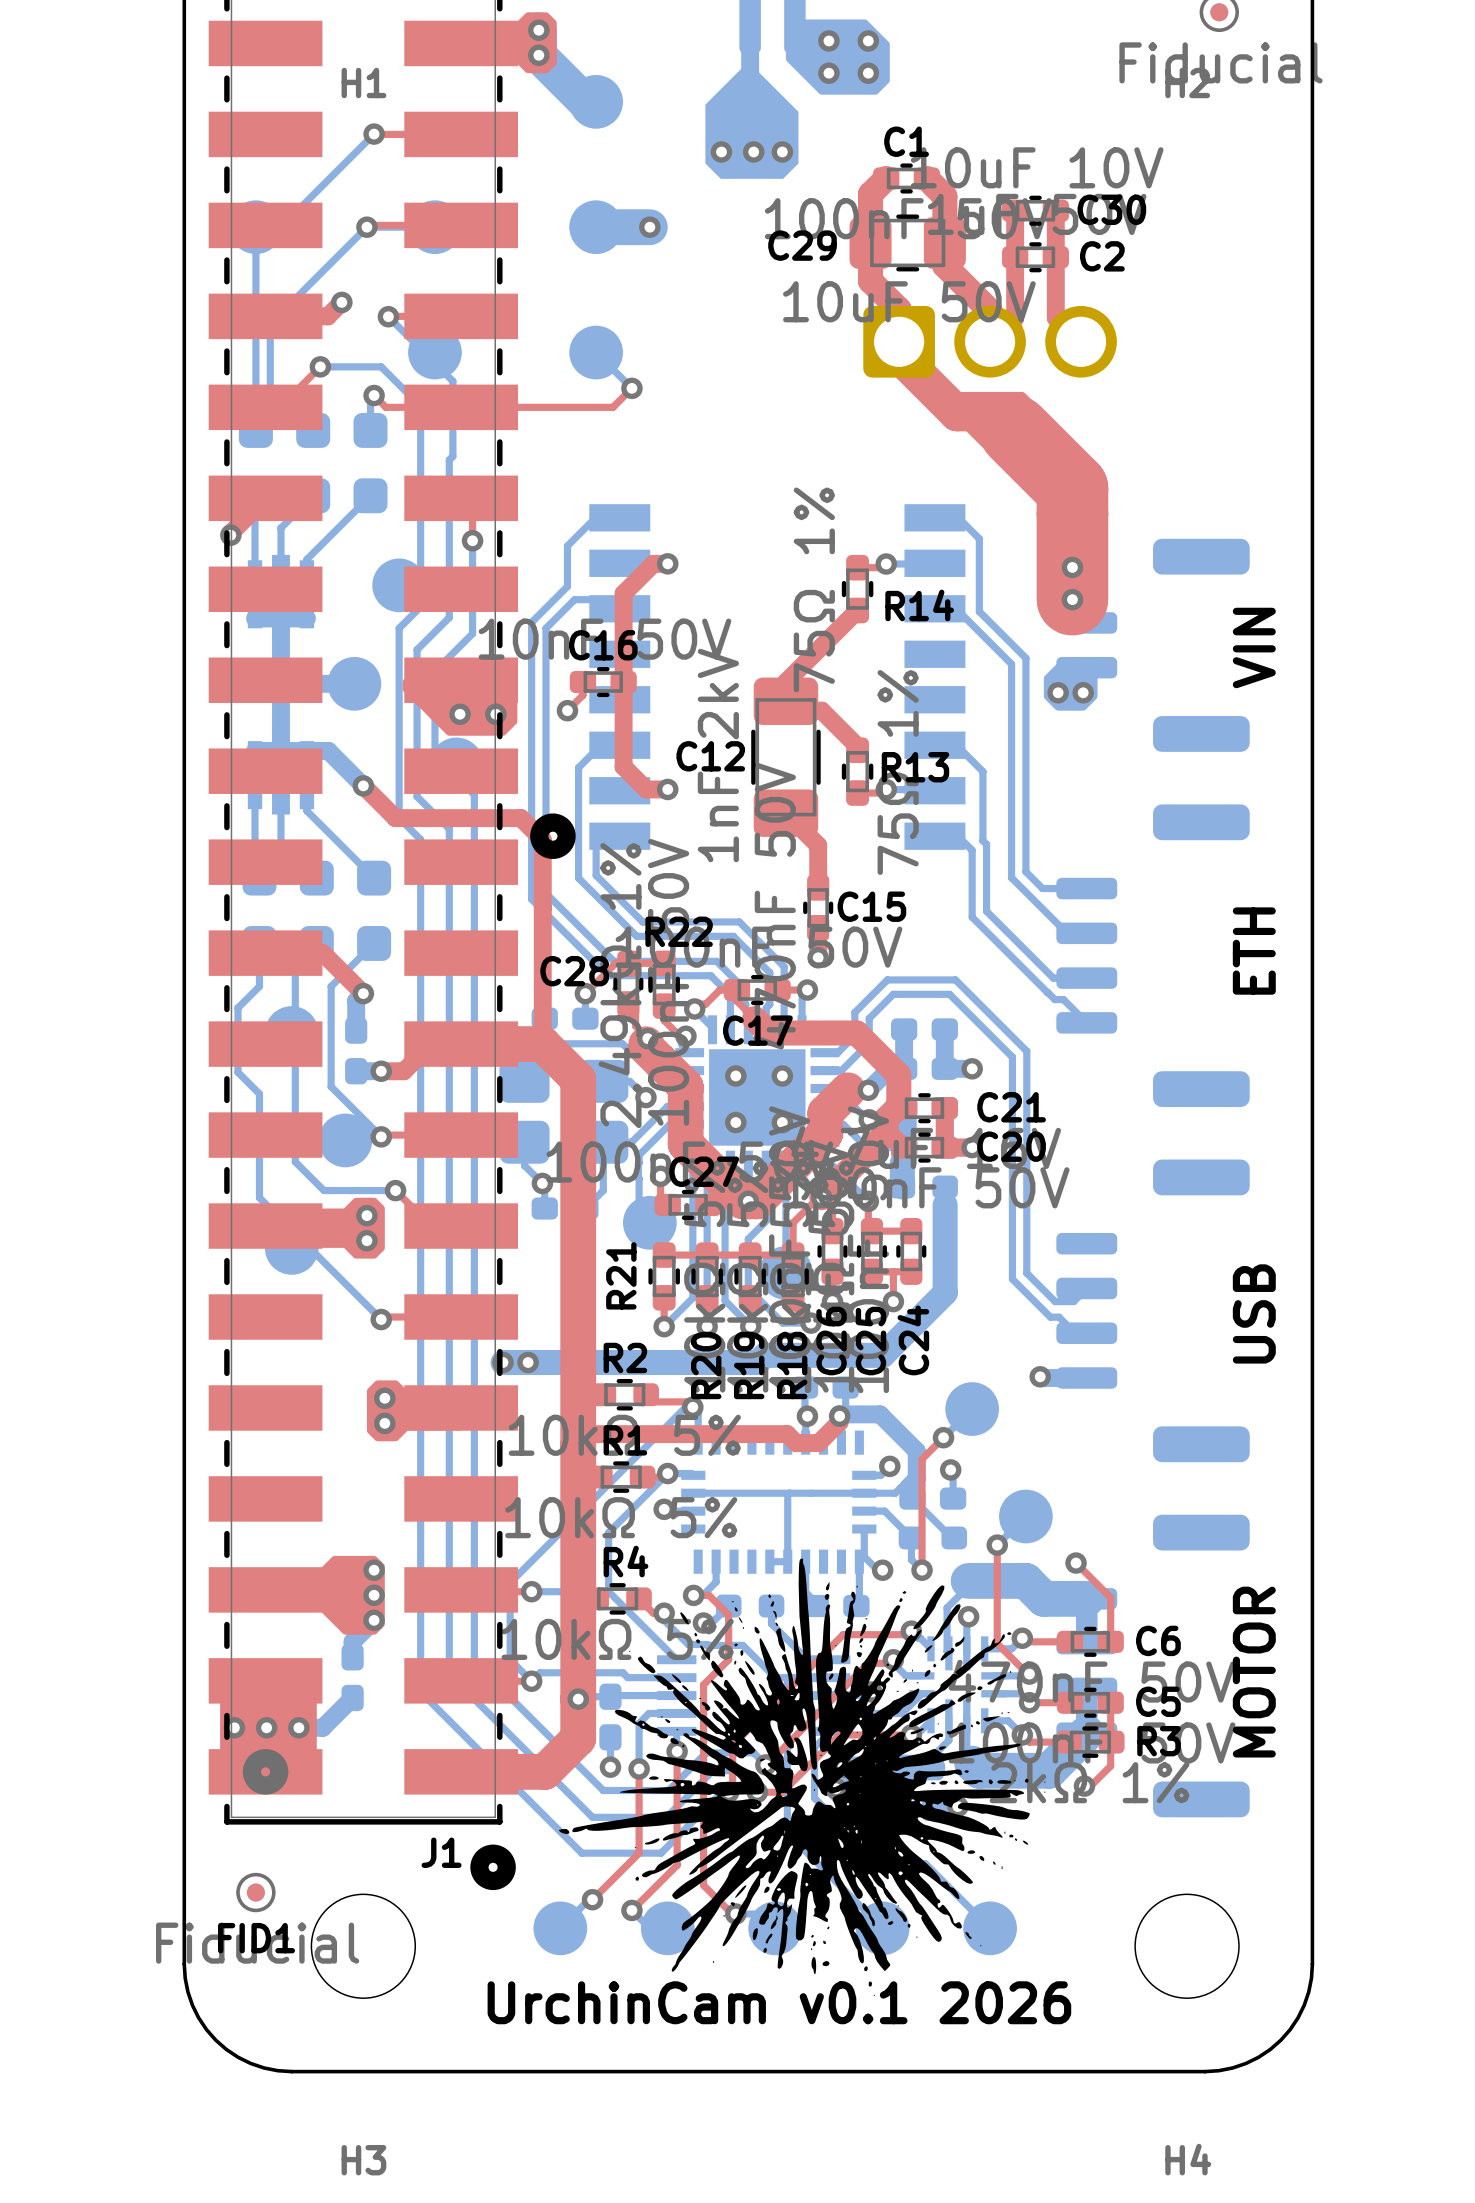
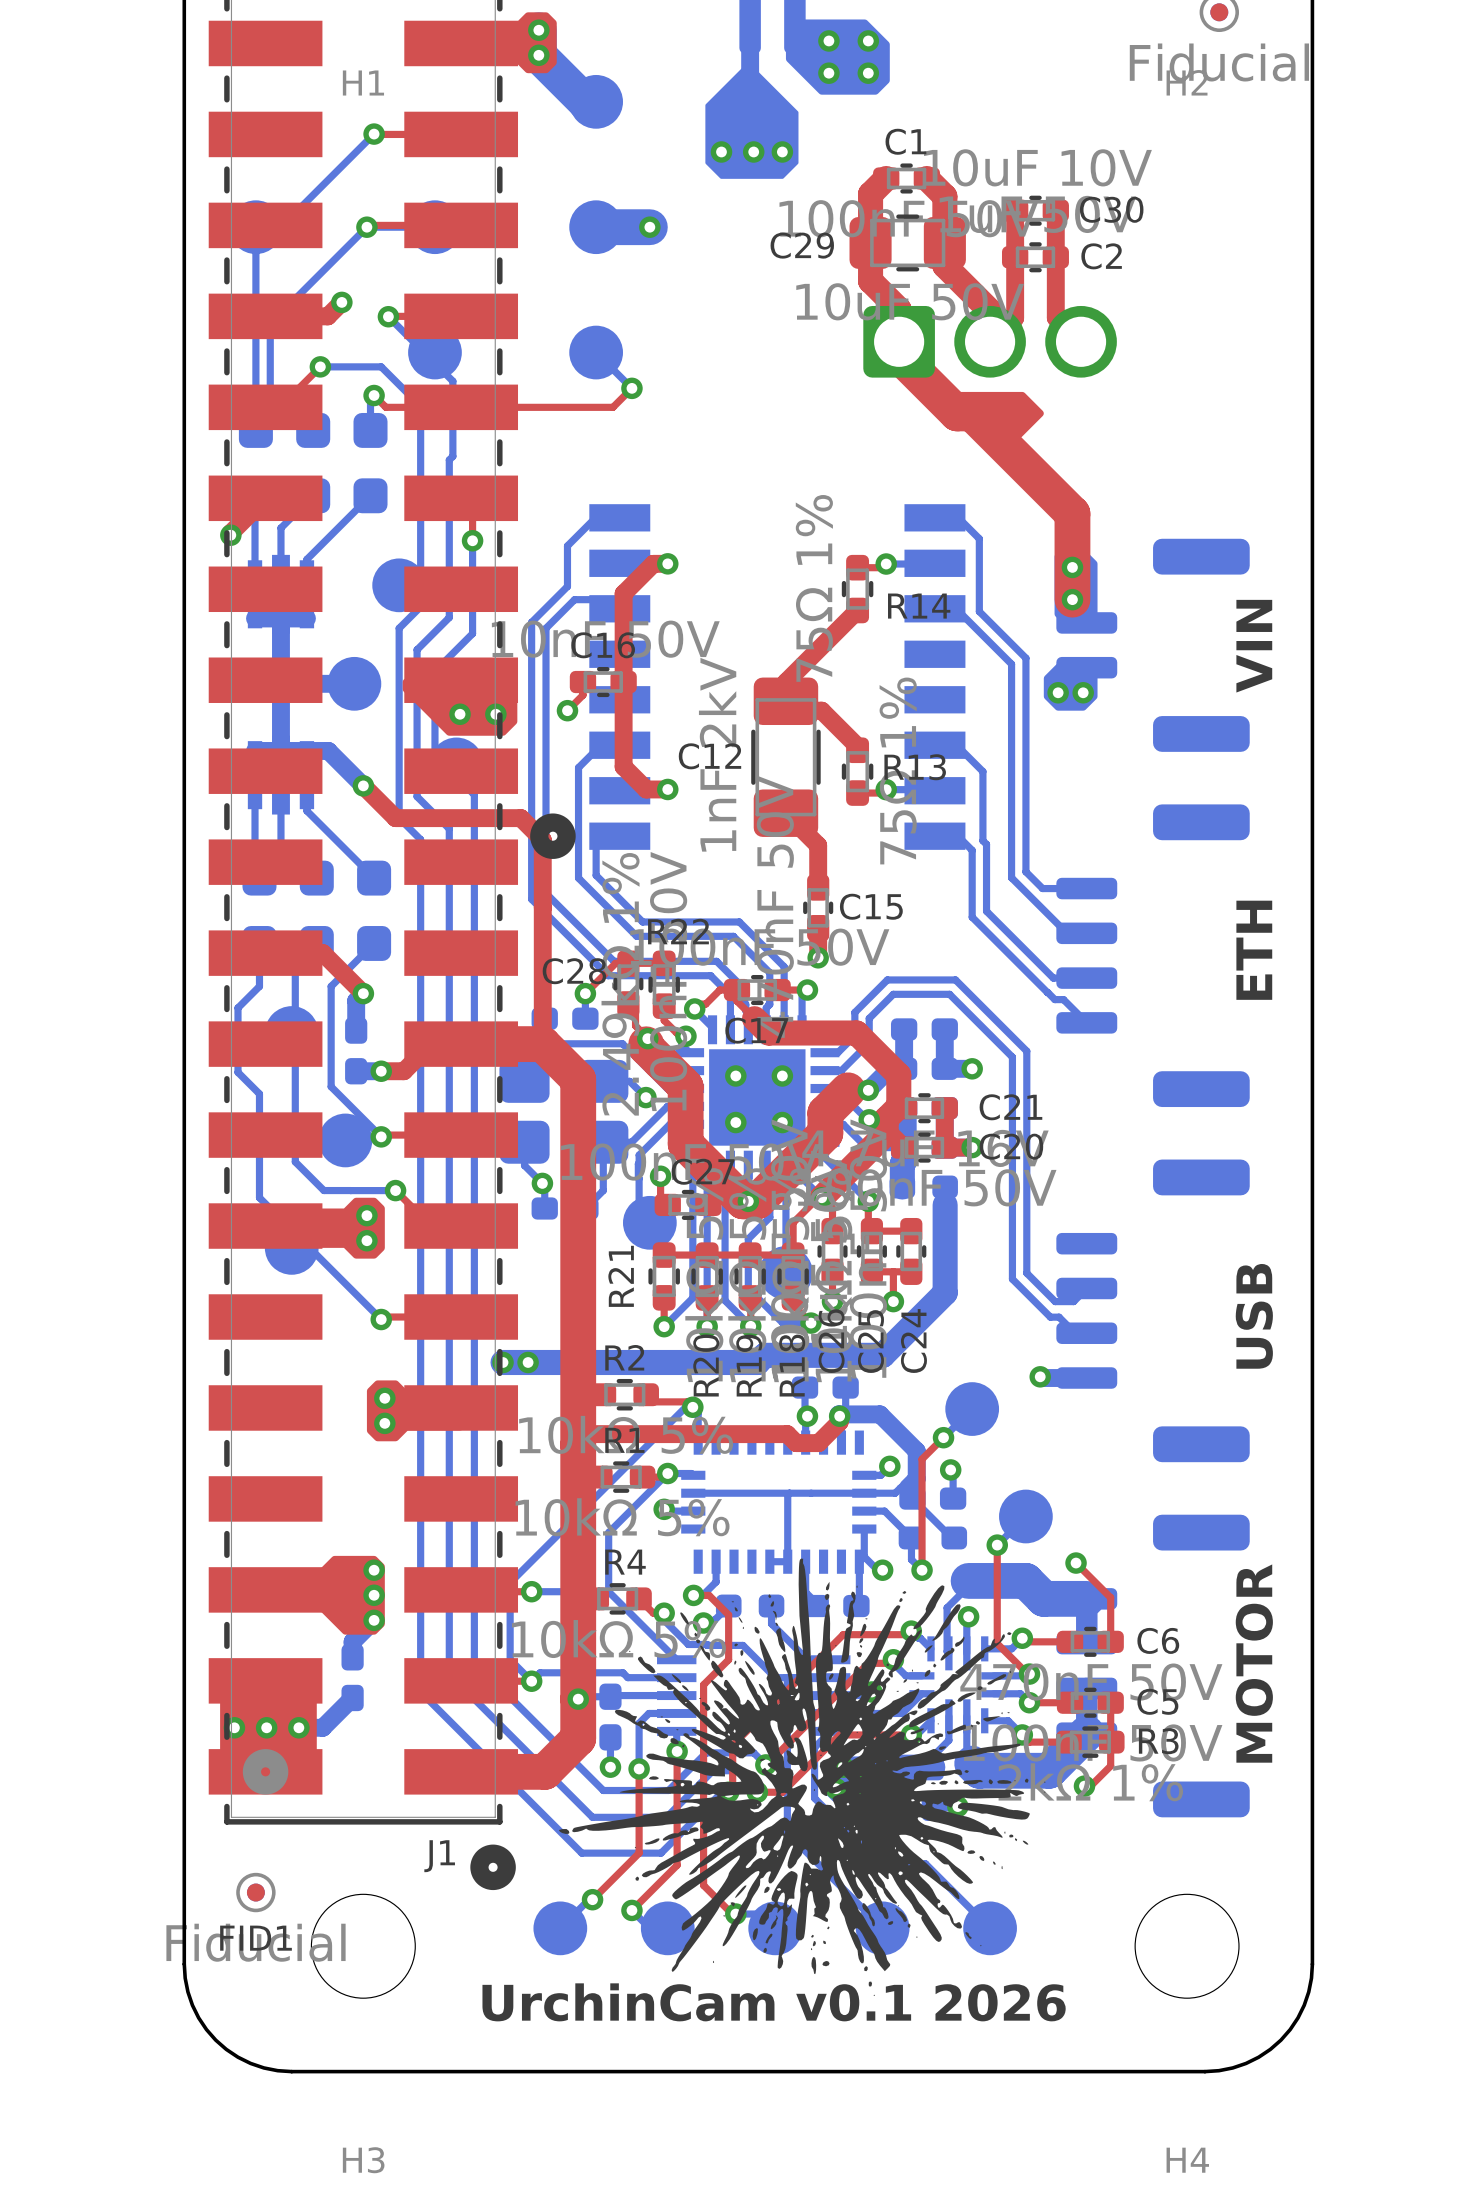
top track: (972, 413) (997, 413) (1072, 488) (1072, 513) -> (972, 413) (1072, 513)
top track width: thick (1072, 513) (1072, 599) -> thin (1072, 513) (1072, 599)

